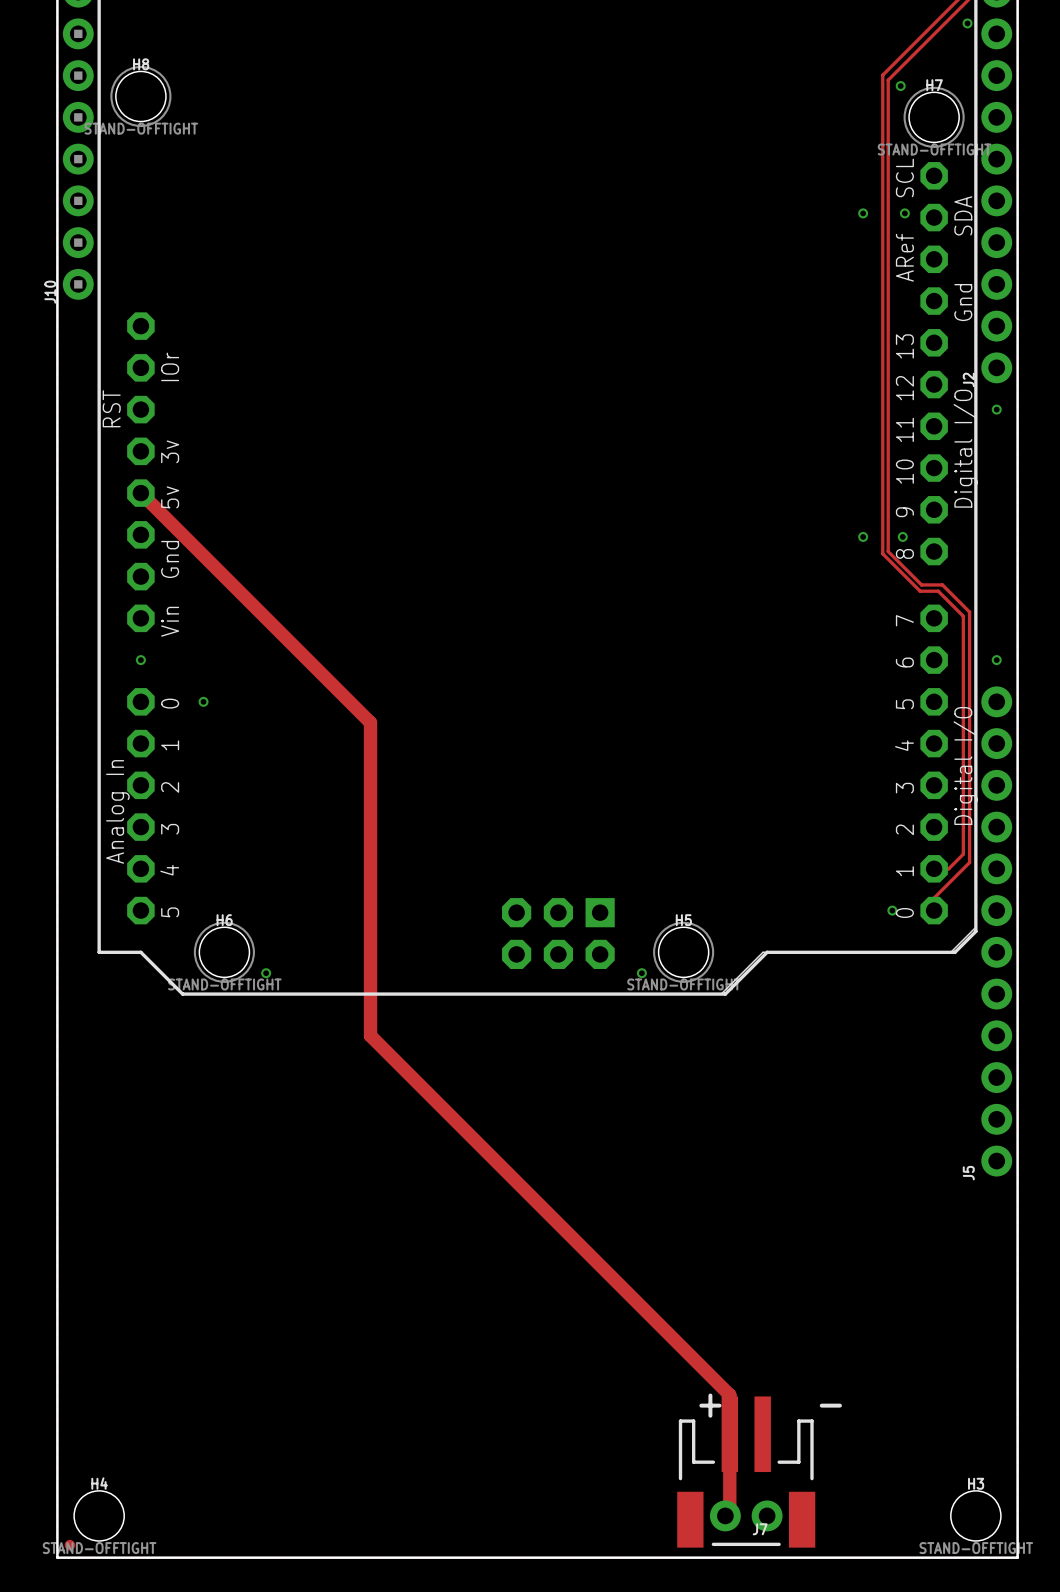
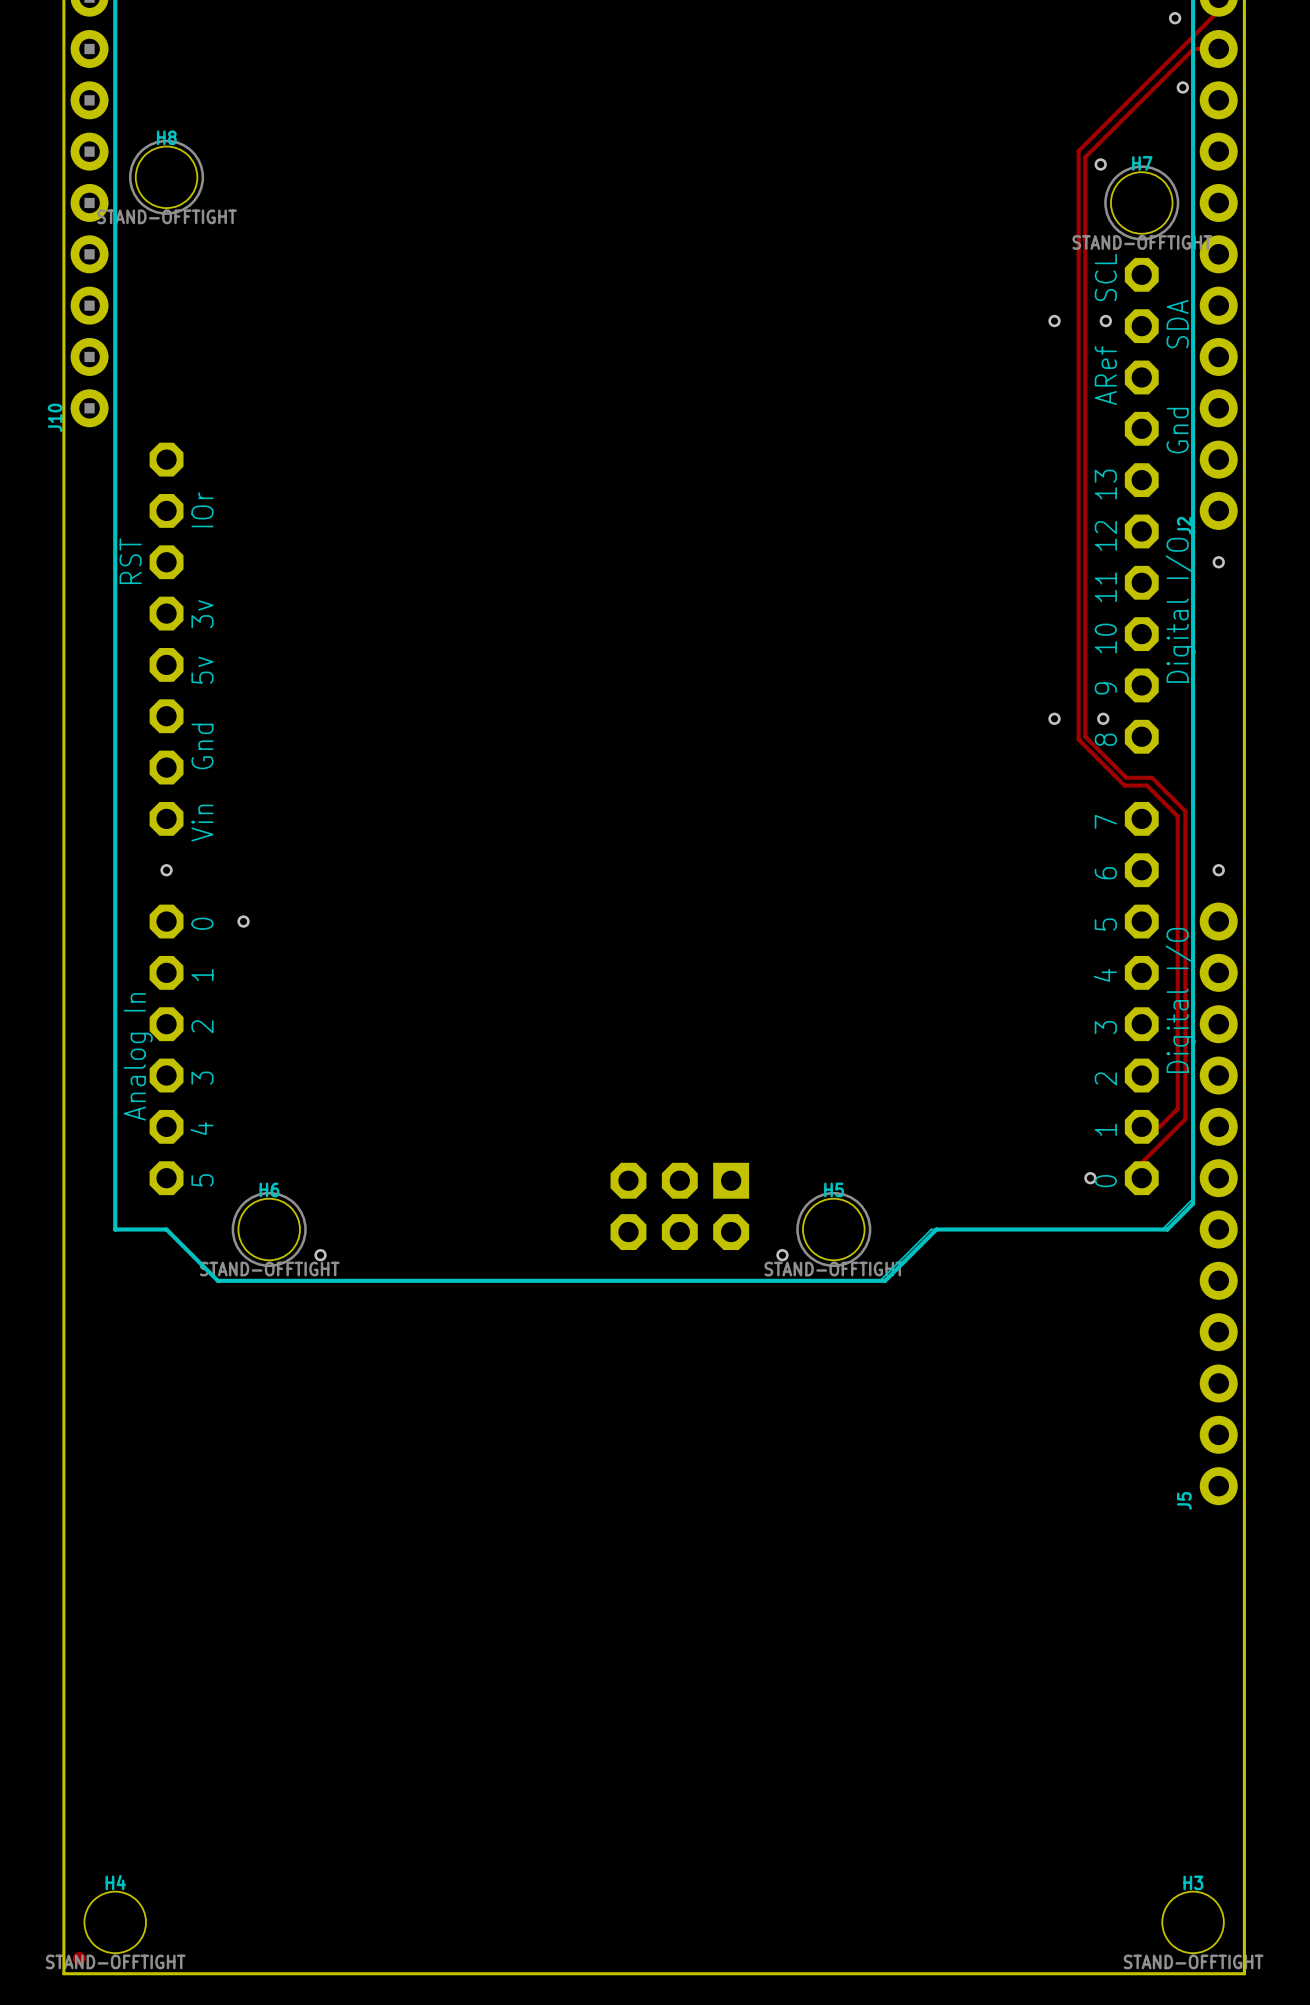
track: (140, 493) (370, 722) (370, 1035) (729, 1395) (729, 1511) (725, 1515) -> none
text: + - (770, 1405) -> none
J7: (746, 1472) -> none
part: (746, 1515) -> none

